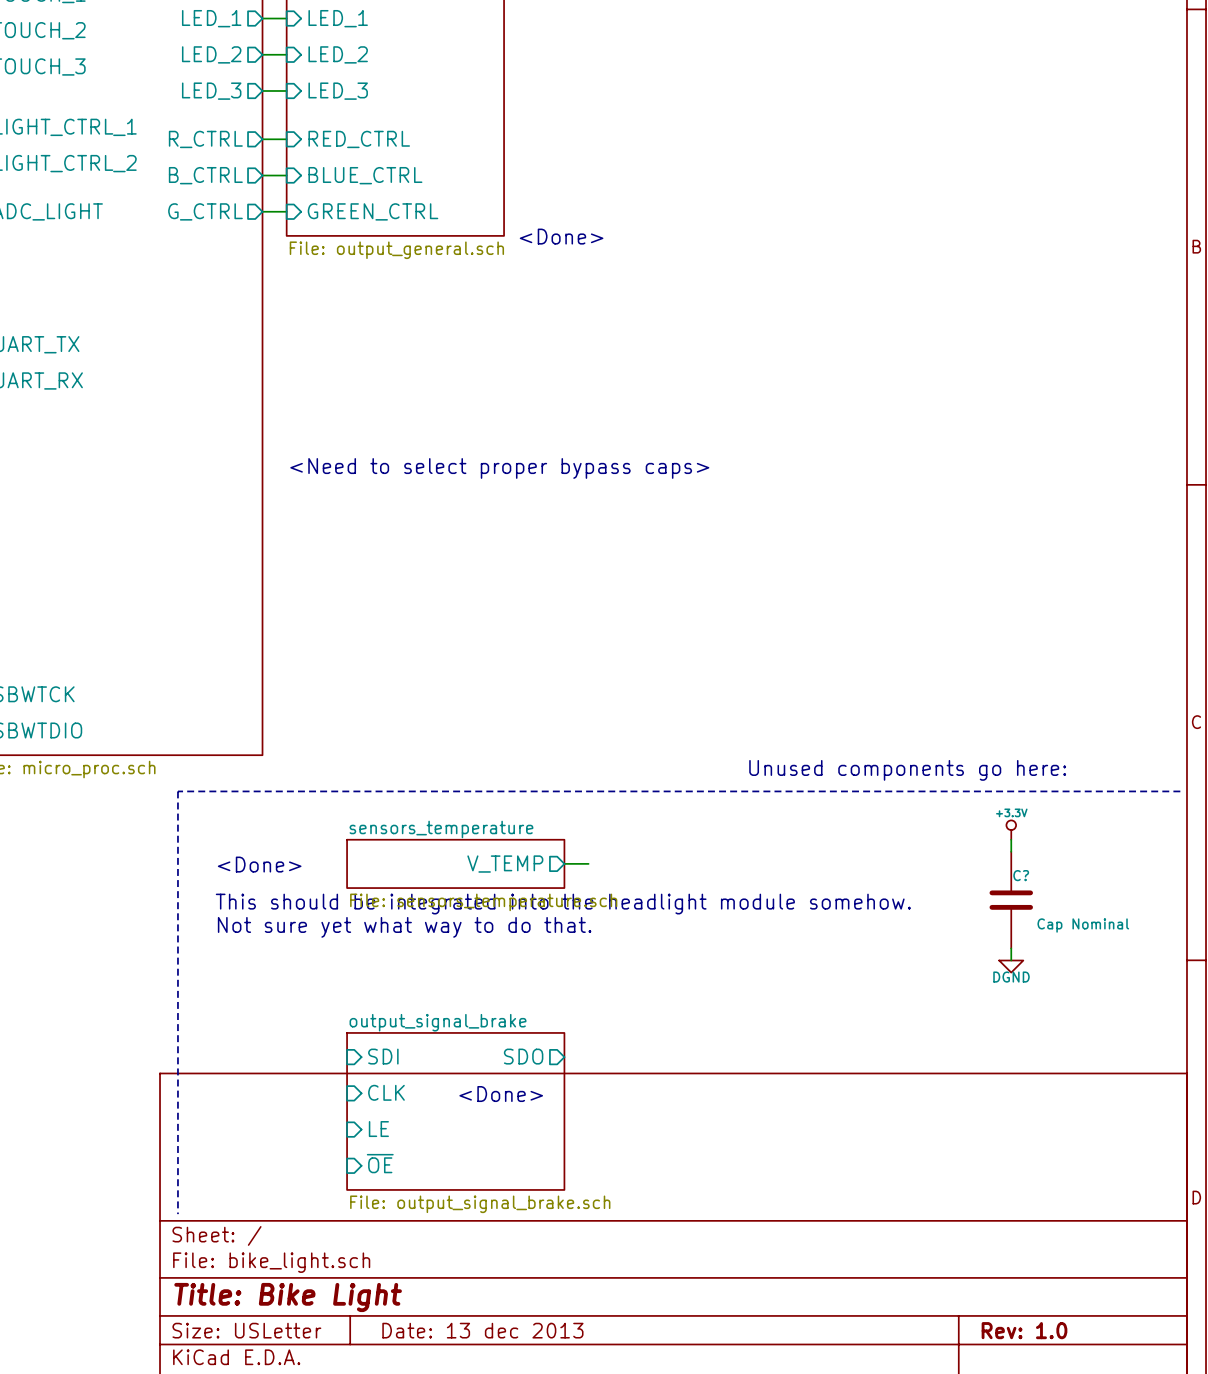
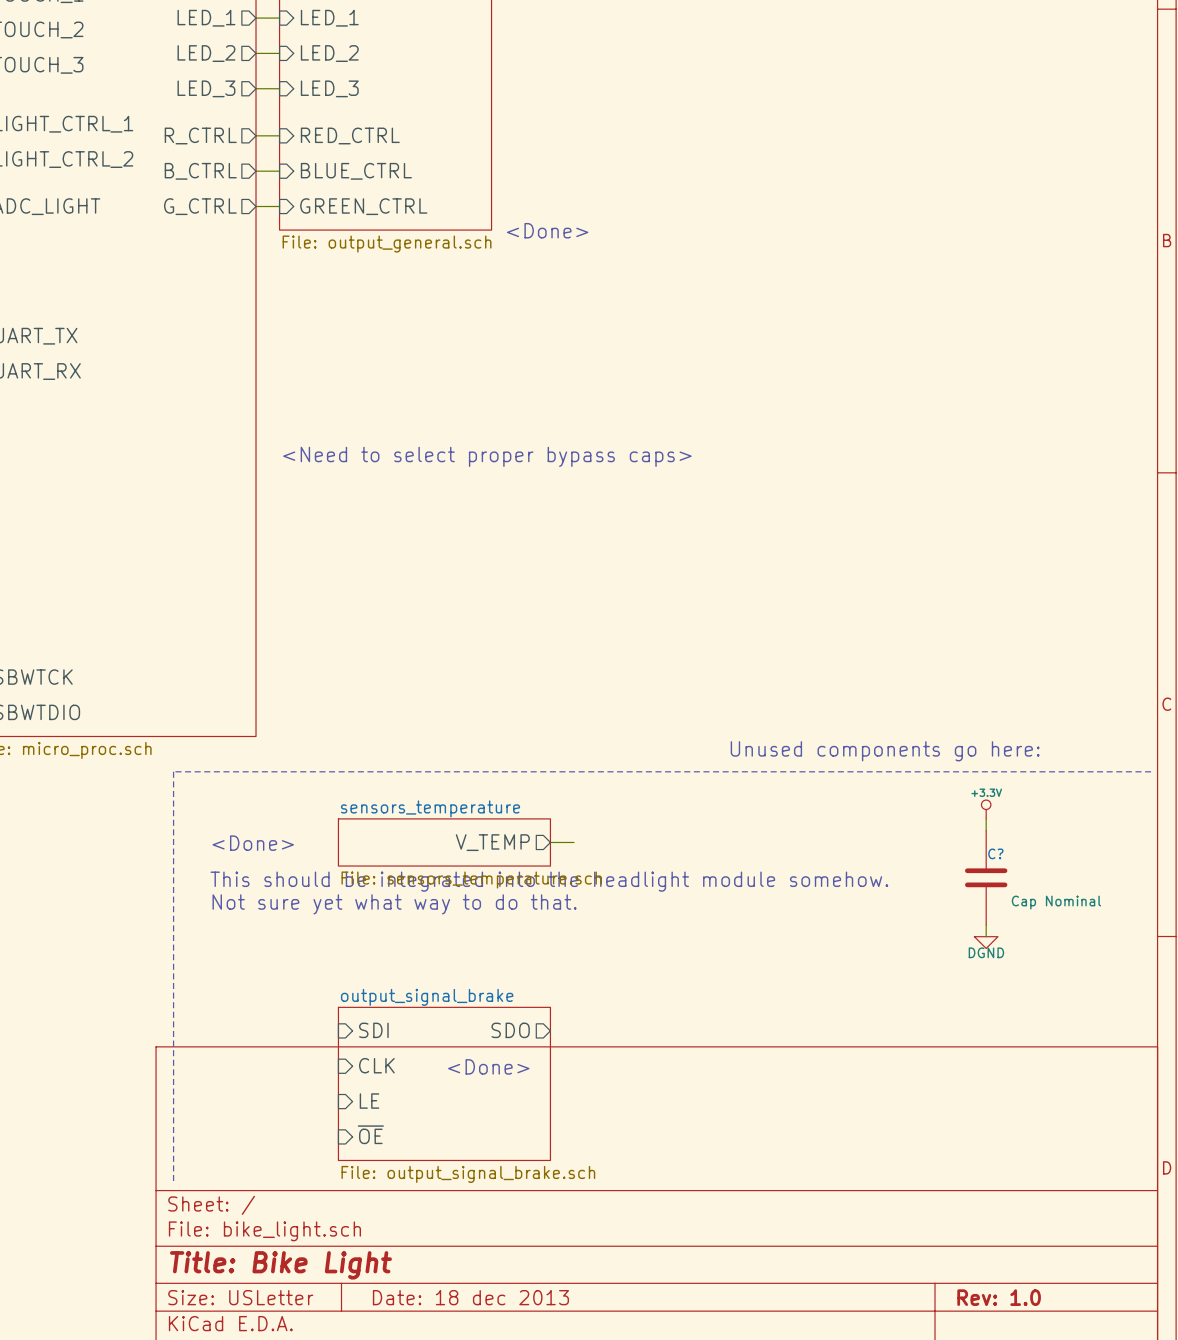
title block: Date: 13 dec 2013 (482, 1330) -> Date: 18 dec 2013 (470, 1297)

